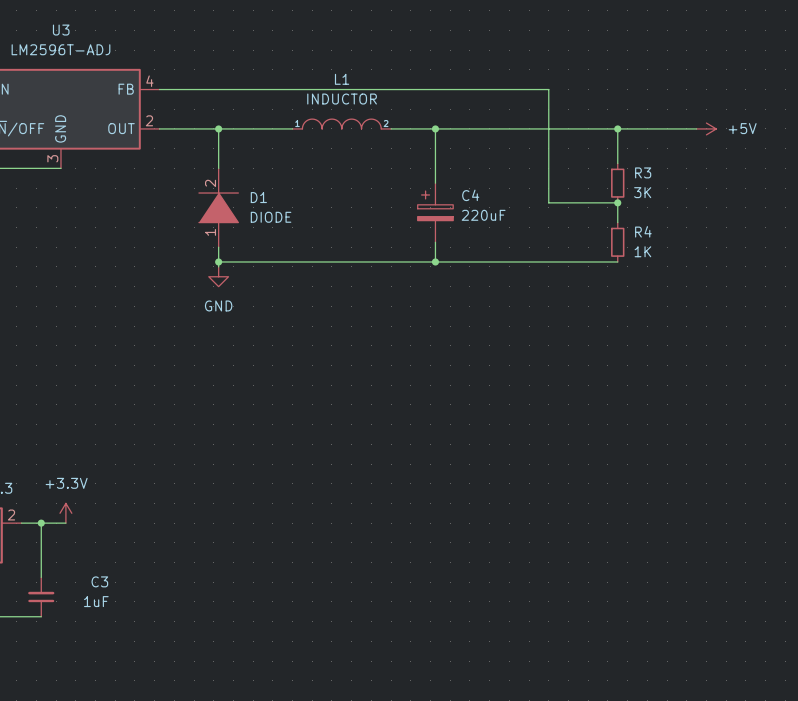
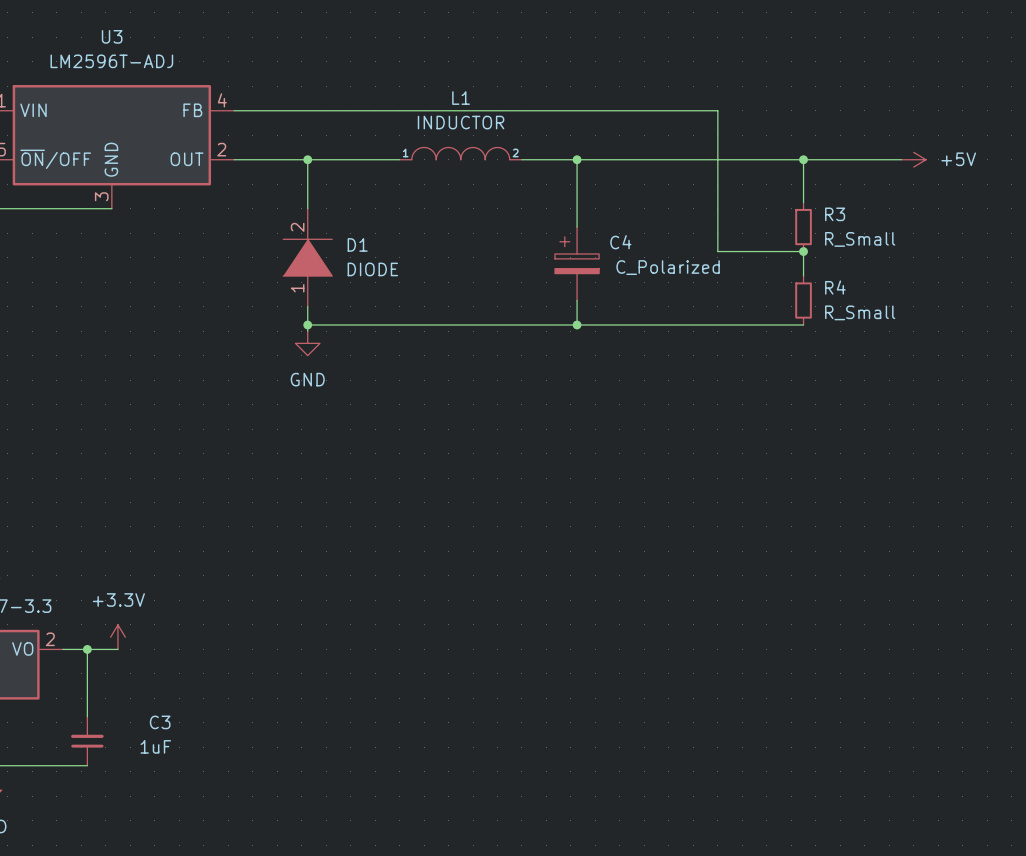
R3 value: 3K (642, 192) -> R_Small (860, 239)
C4 value: 220uF (483, 215) -> C_Polarized (668, 267)
R4 value: 1K (642, 251) -> R_Small (860, 312)

